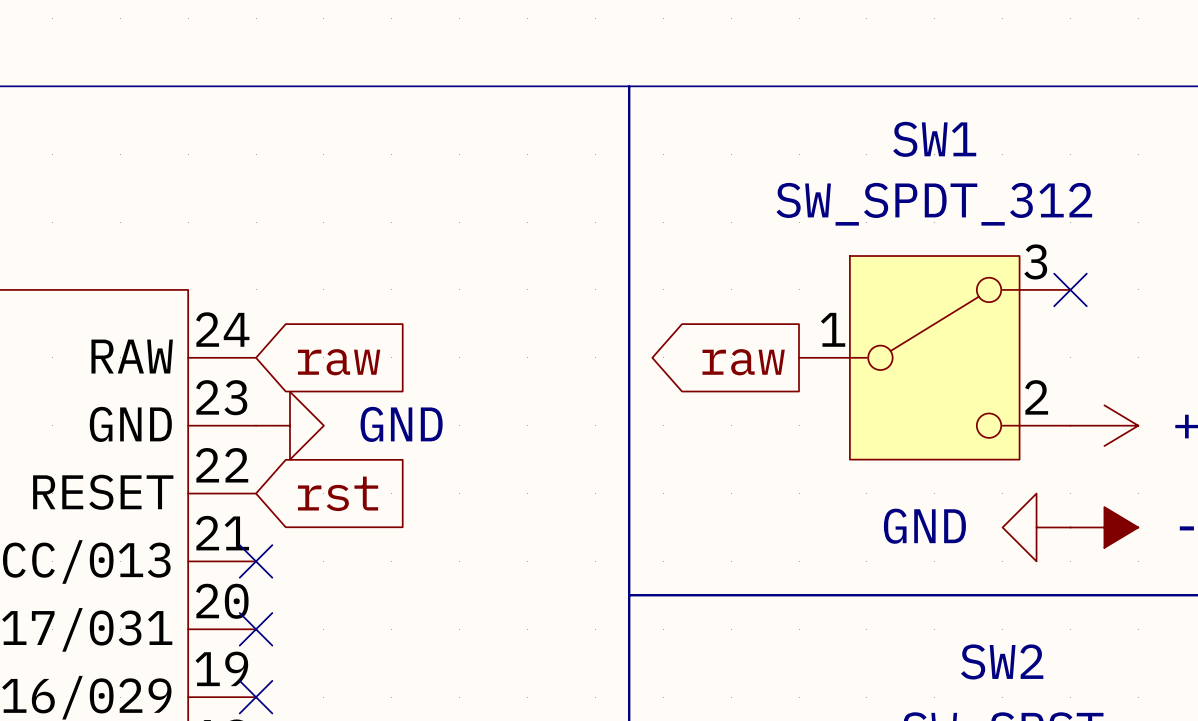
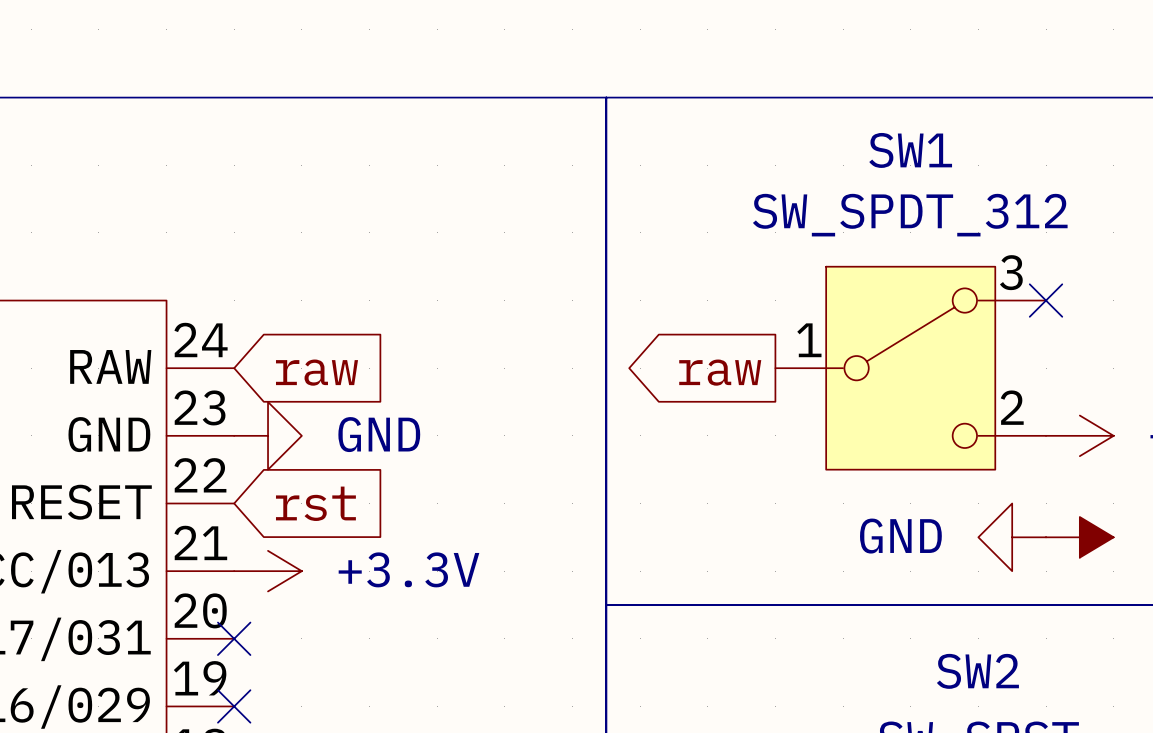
no-connect mark: (256, 561) -> none
power symbol: none -> +3.3V (268, 571)

